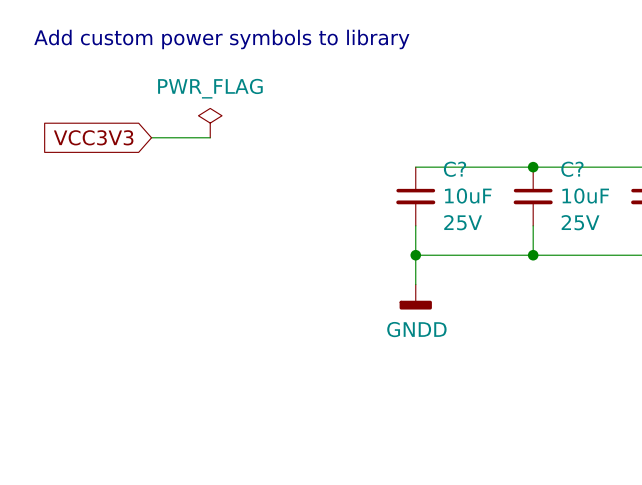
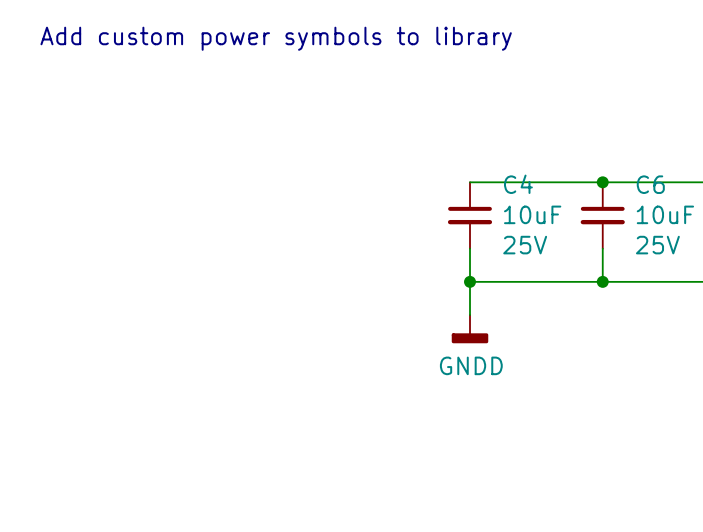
power symbol: PWR_FLAG (210, 123) -> none
global label: VCC3V3 (93, 137) -> none
wire: (151, 137) (210, 137) -> none
C? name: C? (455, 169) -> C4 (518, 184)
C? name: C? (572, 169) -> C6 (650, 184)

